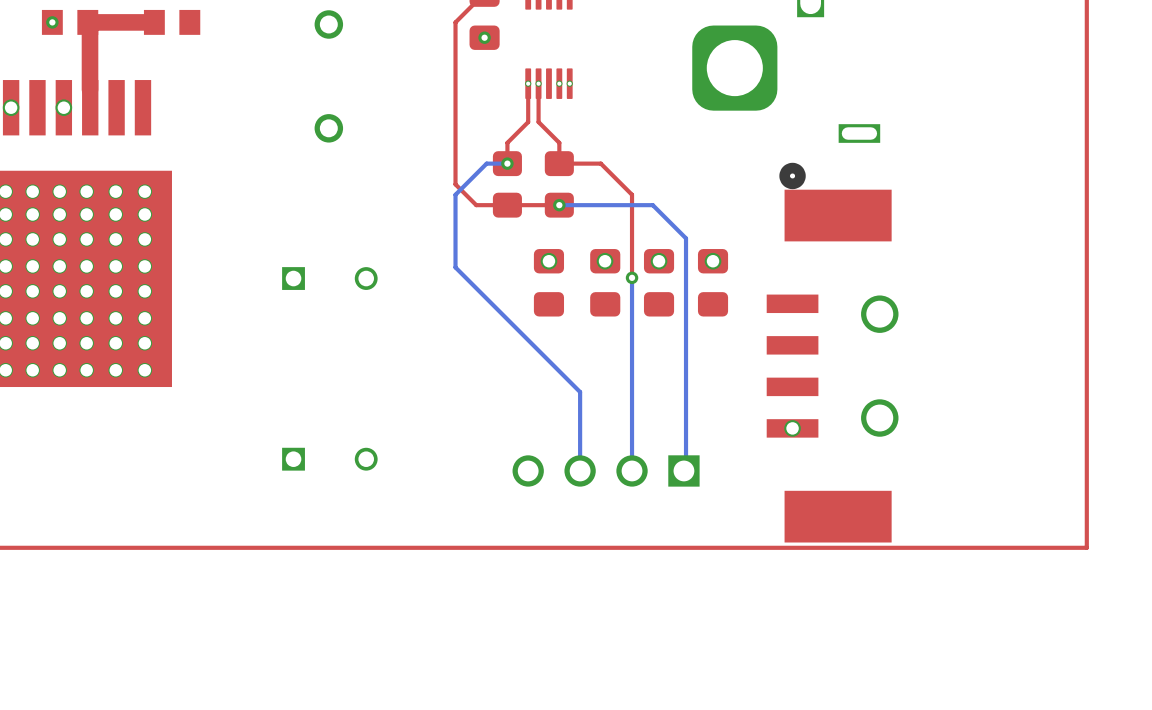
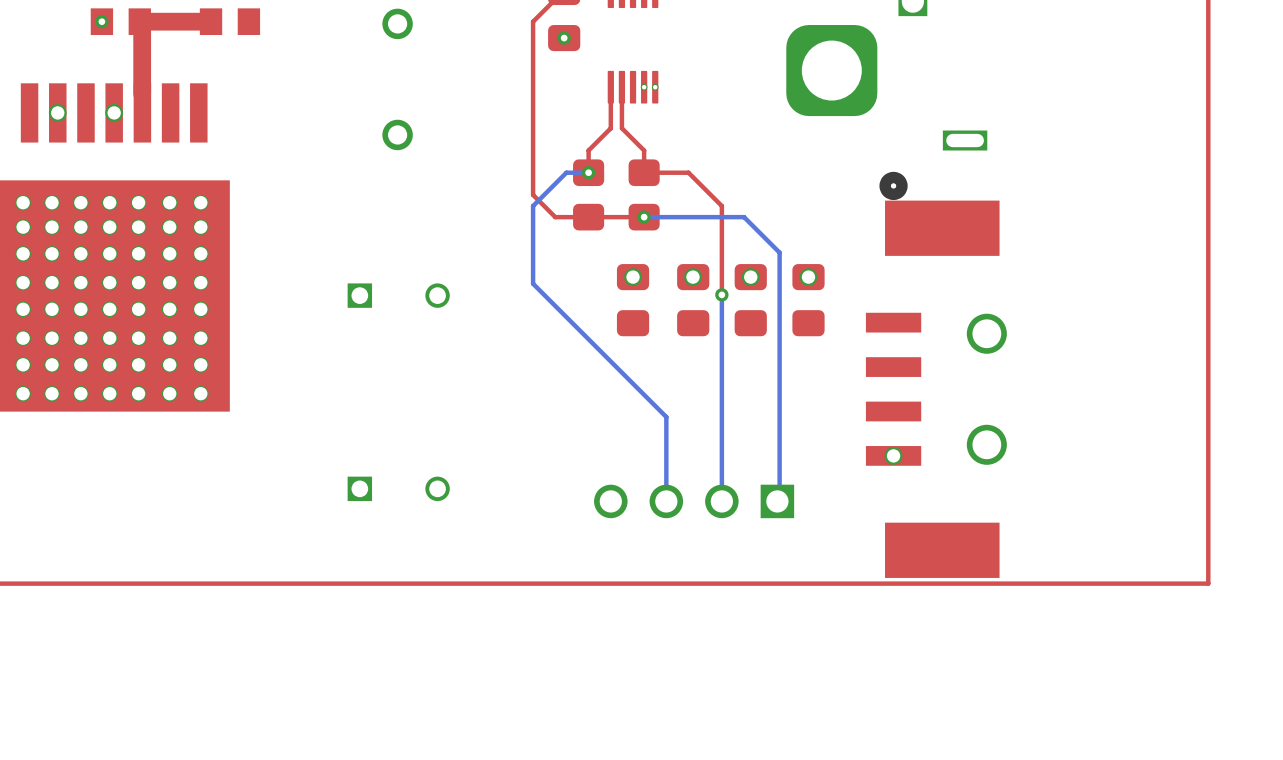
via: (528, 83) -> none
via: (538, 83) -> none

